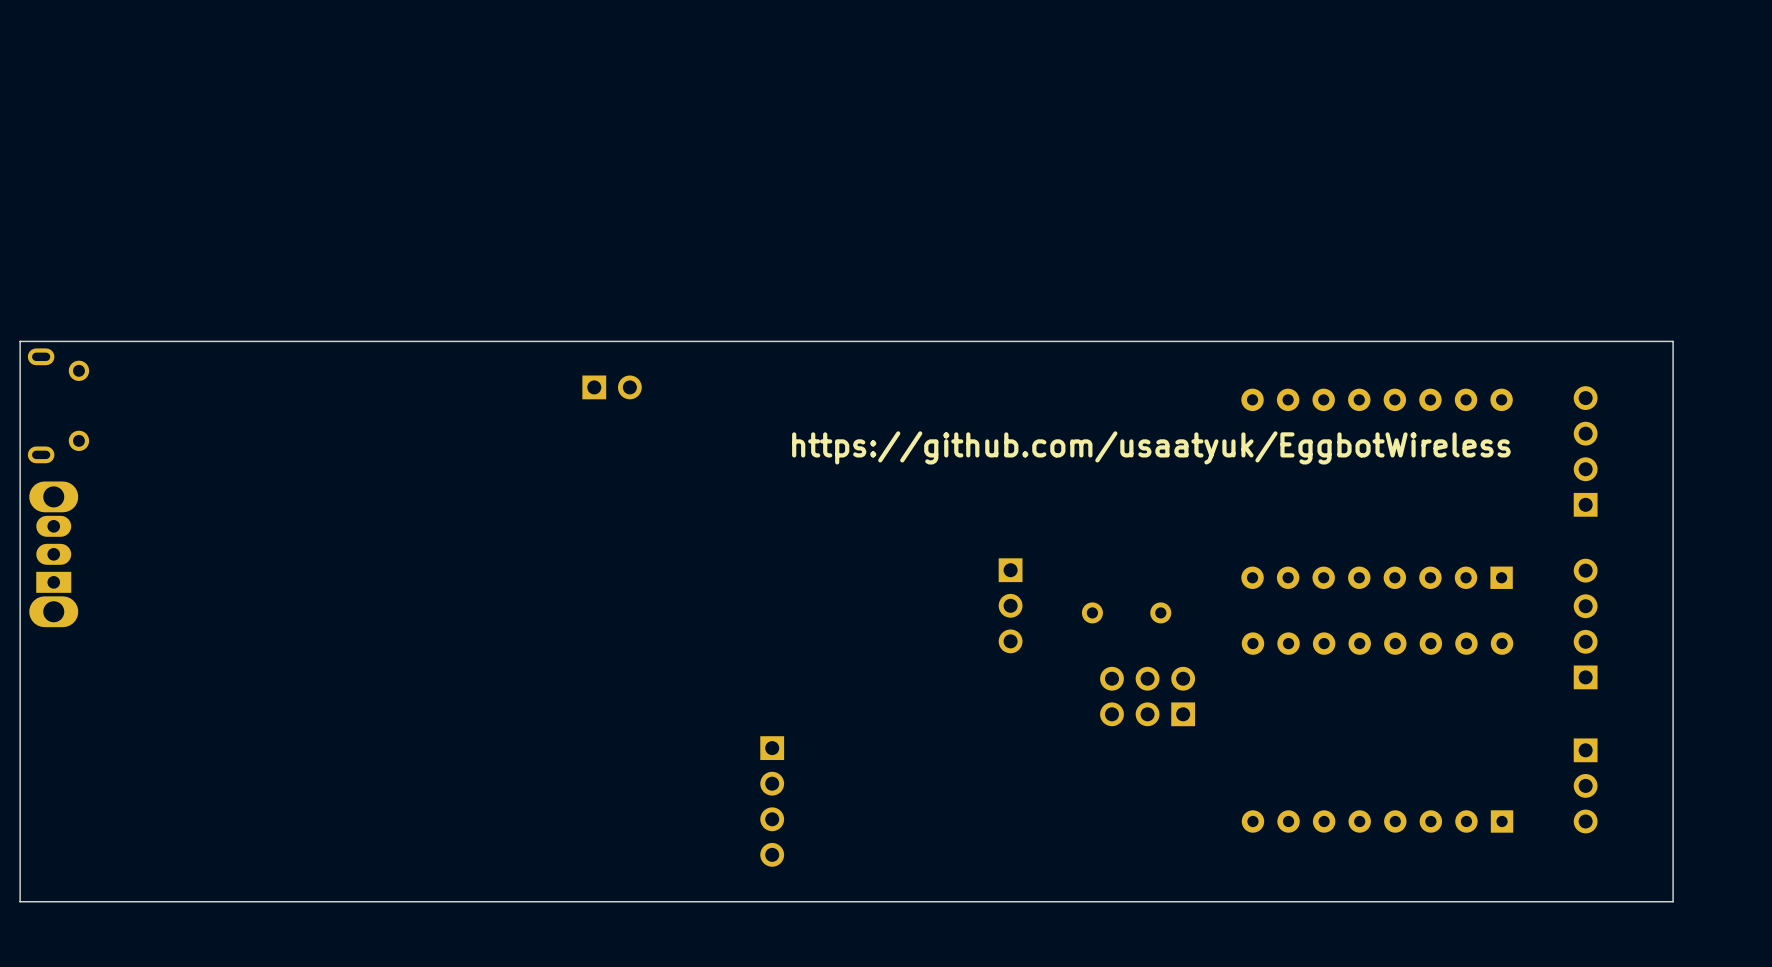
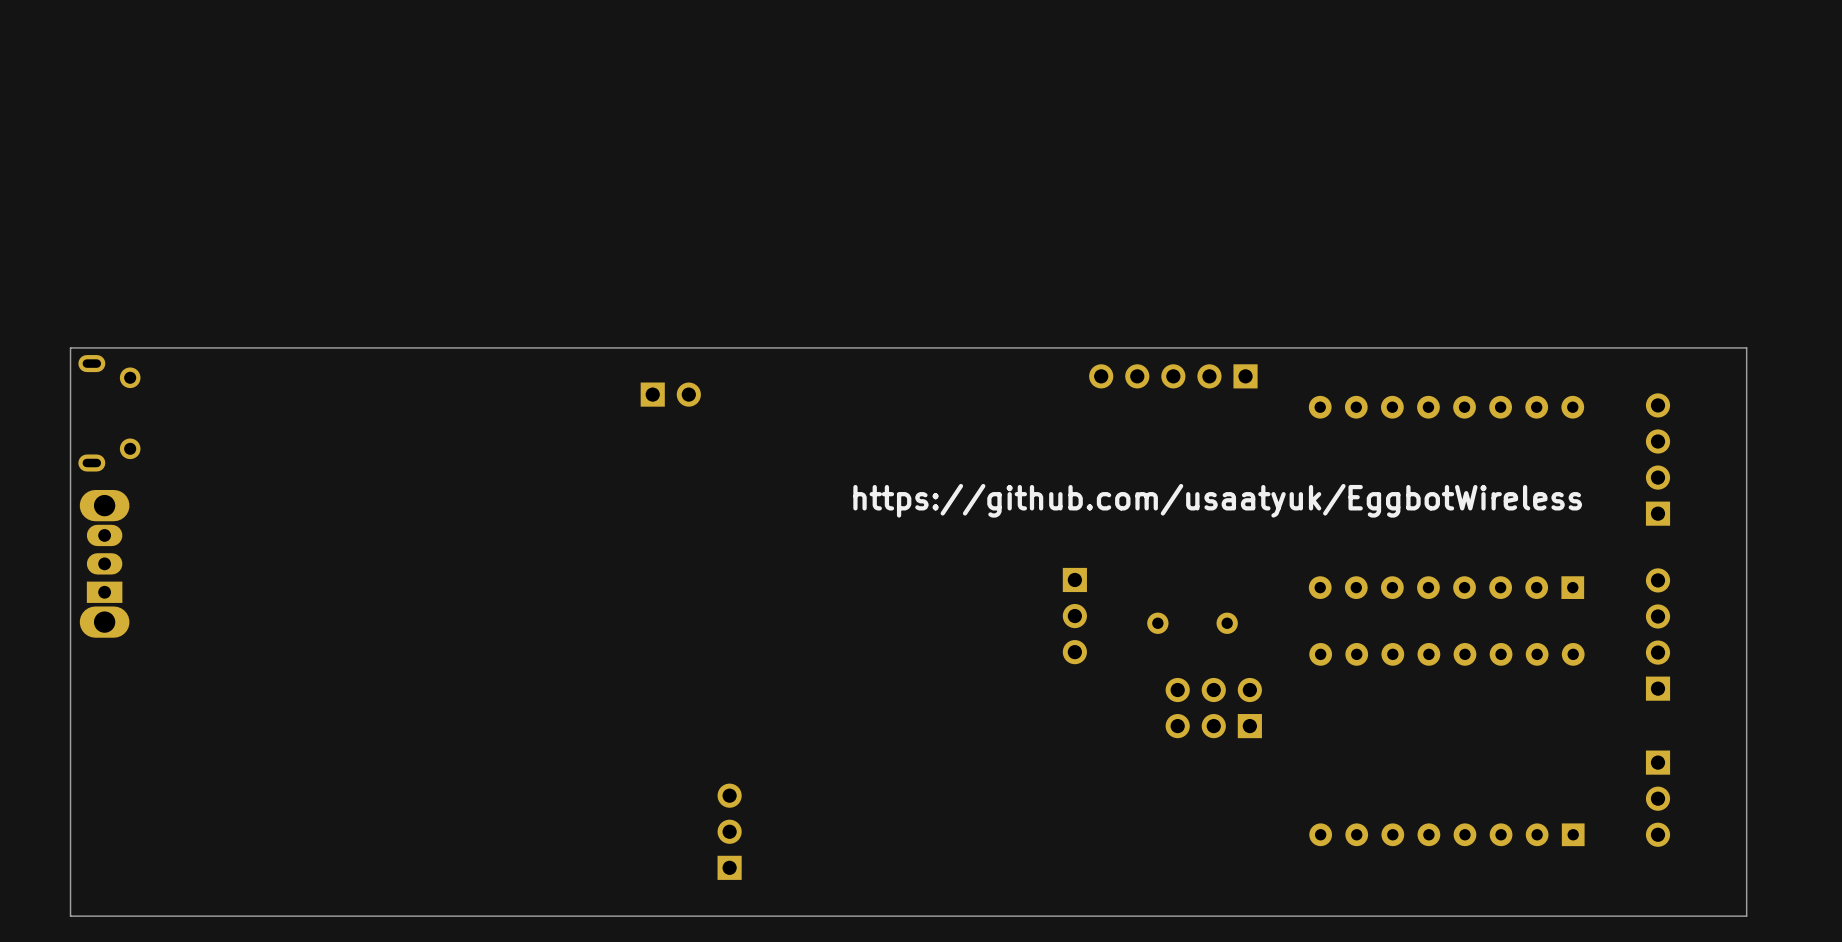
part: none -> (1173, 376)
text position: https://github.com/usaatyuk/EggbotWireless (1151, 447) -> https://github.com/usaatyuk/EggbotWireless (1217, 500)
part: (772, 801) -> none
part: none -> (729, 831)

